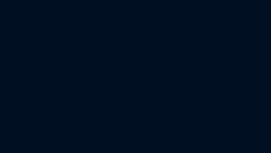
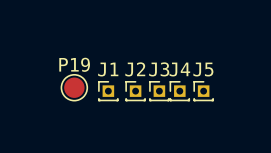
P19: none -> (74, 87)
J1: none -> (108, 91)
J2: none -> (135, 91)
J3: none -> (159, 91)
J4: none -> (179, 91)
J5: none -> (203, 91)

